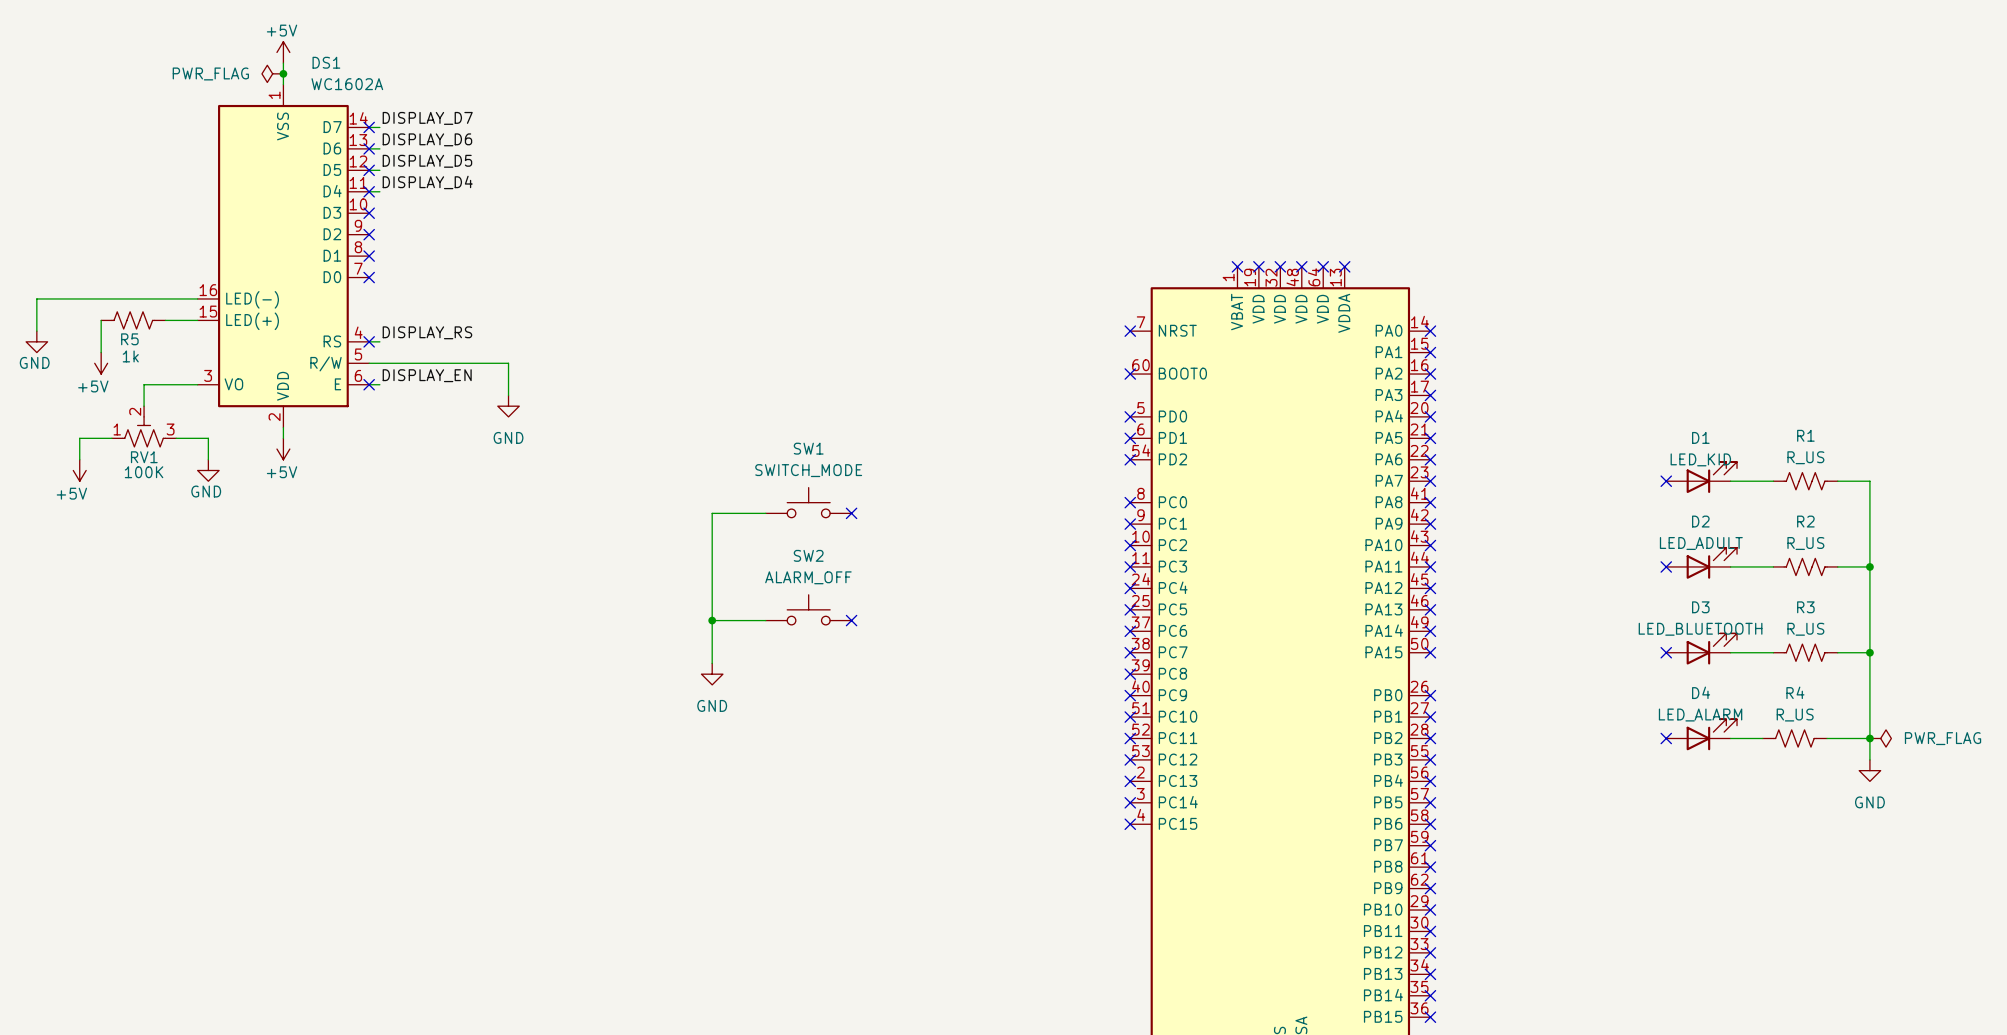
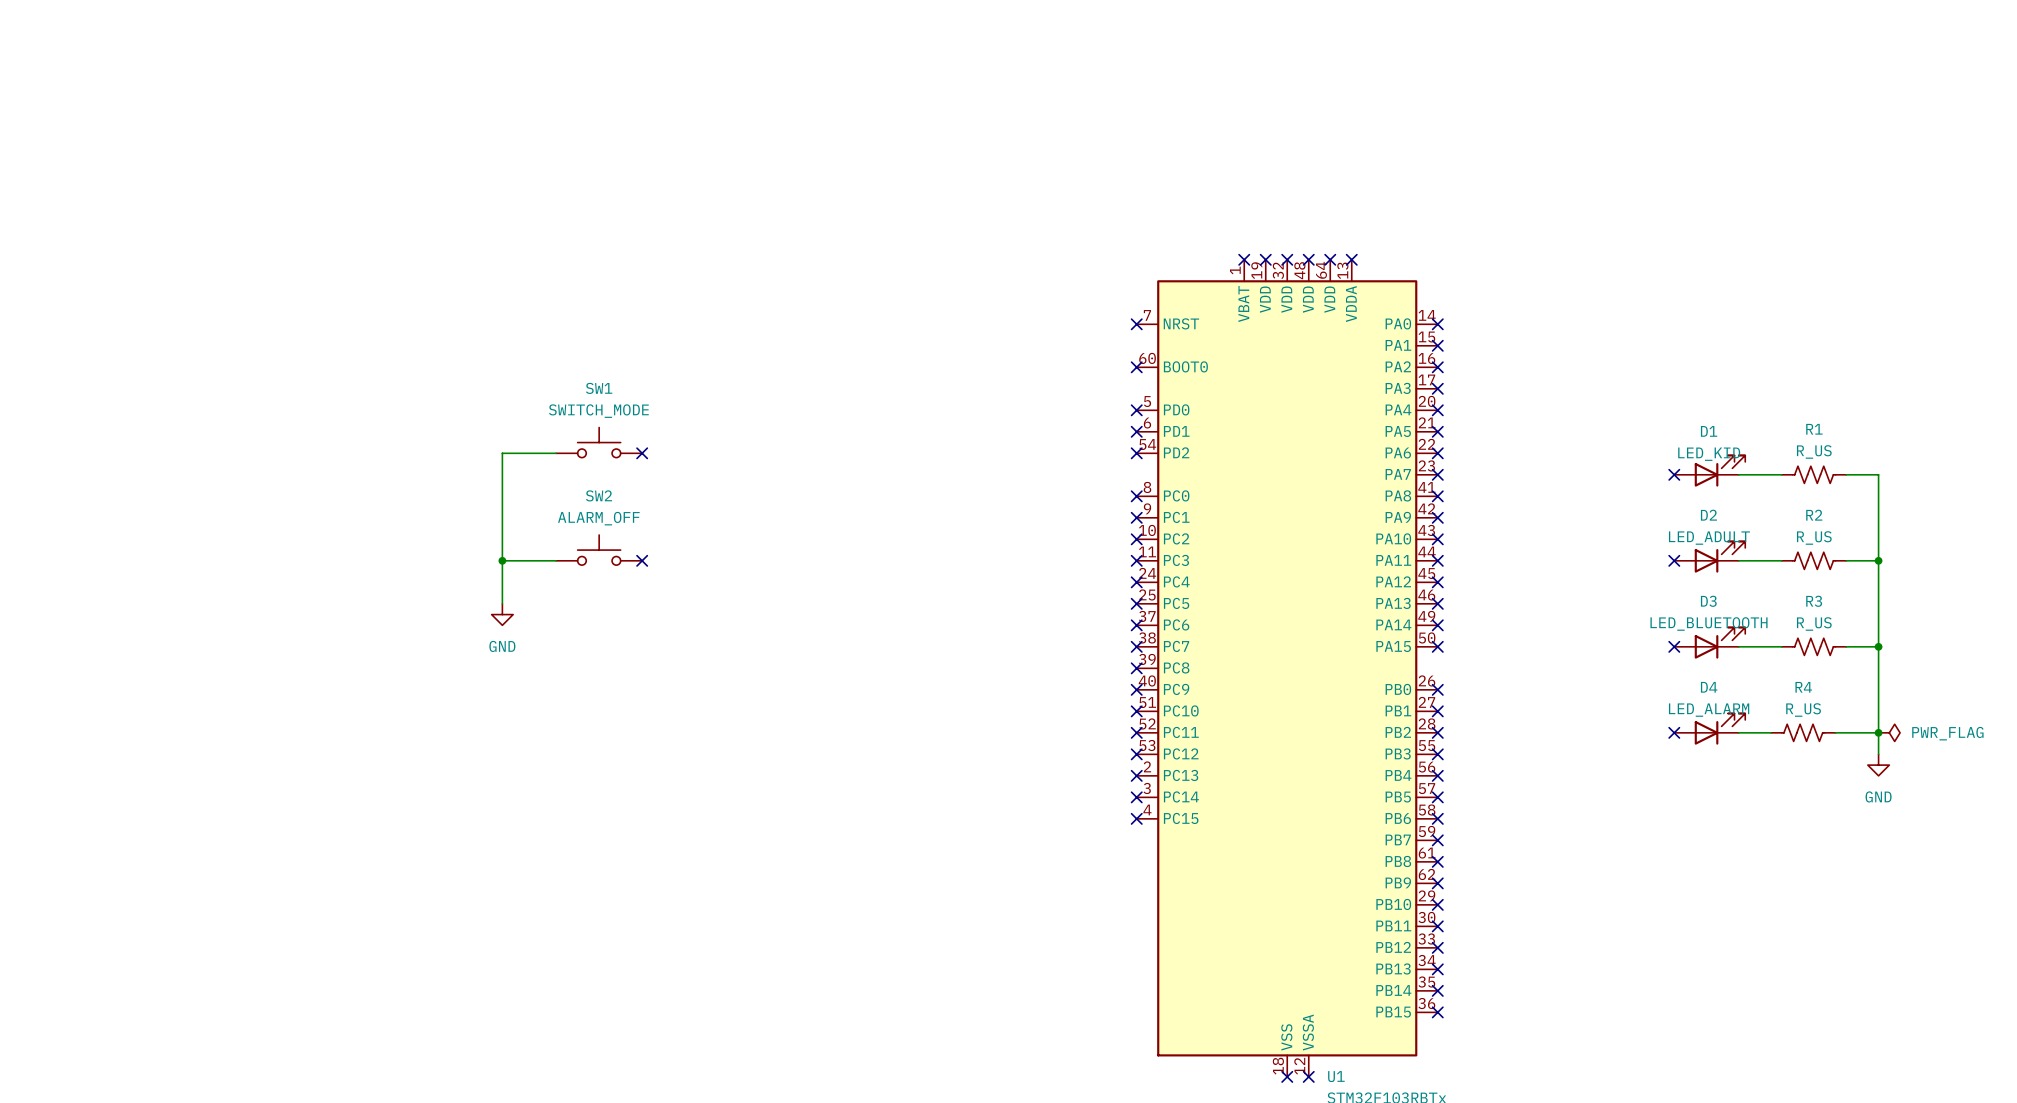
power symbol: +5V (283, 52) -> none
wire: (283, 63) (283, 84) -> none
power symbol: PWR_FLAG (272, 73) -> none
junction: (283, 73) -> none
label: DISPLAY_D7 (427, 118) -> none
wire: (369, 127) (379, 127) -> none
no-connect mark: (369, 127) -> none
label: DISPLAY_D6 (427, 139) -> none
wire: (369, 148) (379, 148) -> none
no-connect mark: (369, 148) -> none
label: DISPLAY_D5 (427, 161) -> none
wire: (369, 170) (379, 170) -> none
no-connect mark: (369, 170) -> none
label: DISPLAY_D4 (427, 182) -> none
wire: (369, 191) (379, 191) -> none
no-connect mark: (369, 191) -> none
no-connect mark: (369, 213) -> none
no-connect mark: (369, 234) -> none
DS1: WC1602A (283, 256) -> none
no-connect mark: (369, 256) -> none
no-connect mark: (369, 277) -> none
wire: (197, 298) (36, 298) (36, 331) -> none
wire: (101, 320) (101, 352) -> none
R5: 1k (133, 320) -> none
wire: (165, 320) (197, 320) -> none
label: DISPLAY_RS (427, 332) -> none
power symbol: GND (36, 341) -> none
wire: (369, 341) (379, 341) -> none
no-connect mark: (369, 341) -> none
power symbol: +5V (101, 363) -> none
wire: (369, 363) (508, 363) (508, 395) -> none
label: DISPLAY_EN (427, 375) -> none
wire: (197, 384) (144, 384) (144, 406) -> none
wire: (369, 384) (379, 384) -> none
no-connect mark: (369, 384) -> none
power symbol: GND (508, 406) -> none
RV1: 100K (144, 426) -> none
wire: (283, 427) (283, 438) -> none
wire: (111, 438) (79, 438) (79, 459) -> none
wire: (176, 438) (208, 438) (208, 459) -> none
power symbol: +5V (283, 449) -> none
wire: none -> (556, 453) (502, 453) (502, 603)
no-connect mark: none -> (642, 453)
power symbol: +5V (79, 470) -> none
power symbol: GND (208, 470) -> none
SW1 position: (808, 502) -> (599, 442)
wire: (765, 513) (712, 513) (712, 663) -> none
no-connect mark: (851, 513) -> none
wire: none -> (502, 560) (556, 560)
junction: none -> (502, 560)
no-connect mark: none -> (642, 560)
SW2 position: (808, 609) -> (599, 550)
power symbol: none -> GND (502, 614)
wire: (712, 620) (765, 620) -> none
junction: (712, 620) -> none
no-connect mark: (851, 620) -> none
power symbol: GND (712, 674) -> none

